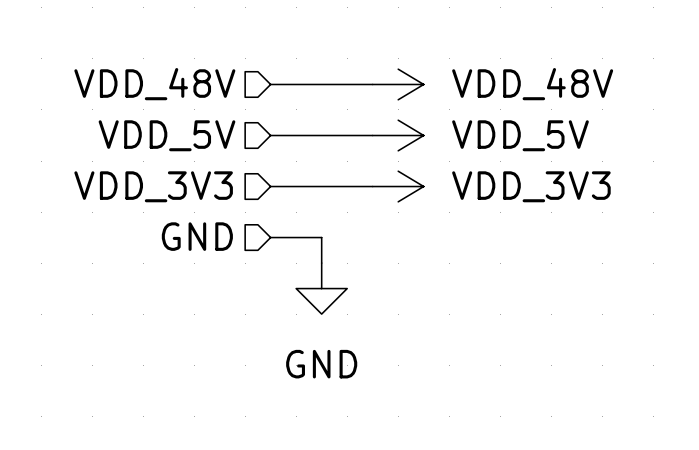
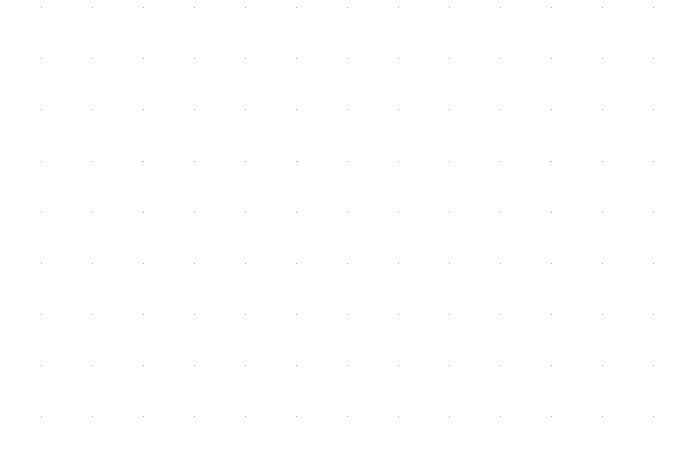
hierarchical label: VDD_48V (154, 84) -> none
wire: (270, 84) (372, 84) -> none
power symbol: VDD_48V (398, 84) -> none
hierarchical label: VDD_5V (167, 135) -> none
wire: (270, 135) (372, 135) -> none
power symbol: VDD_5V (398, 135) -> none
hierarchical label: VDD_3V3 (153, 186) -> none
wire: (270, 186) (372, 186) -> none
power symbol: VDD_3V3 (398, 186) -> none
hierarchical label: GND (197, 236) -> none
wire: (270, 237) (321, 237) (321, 263) -> none
power symbol: GND (321, 288) -> none

